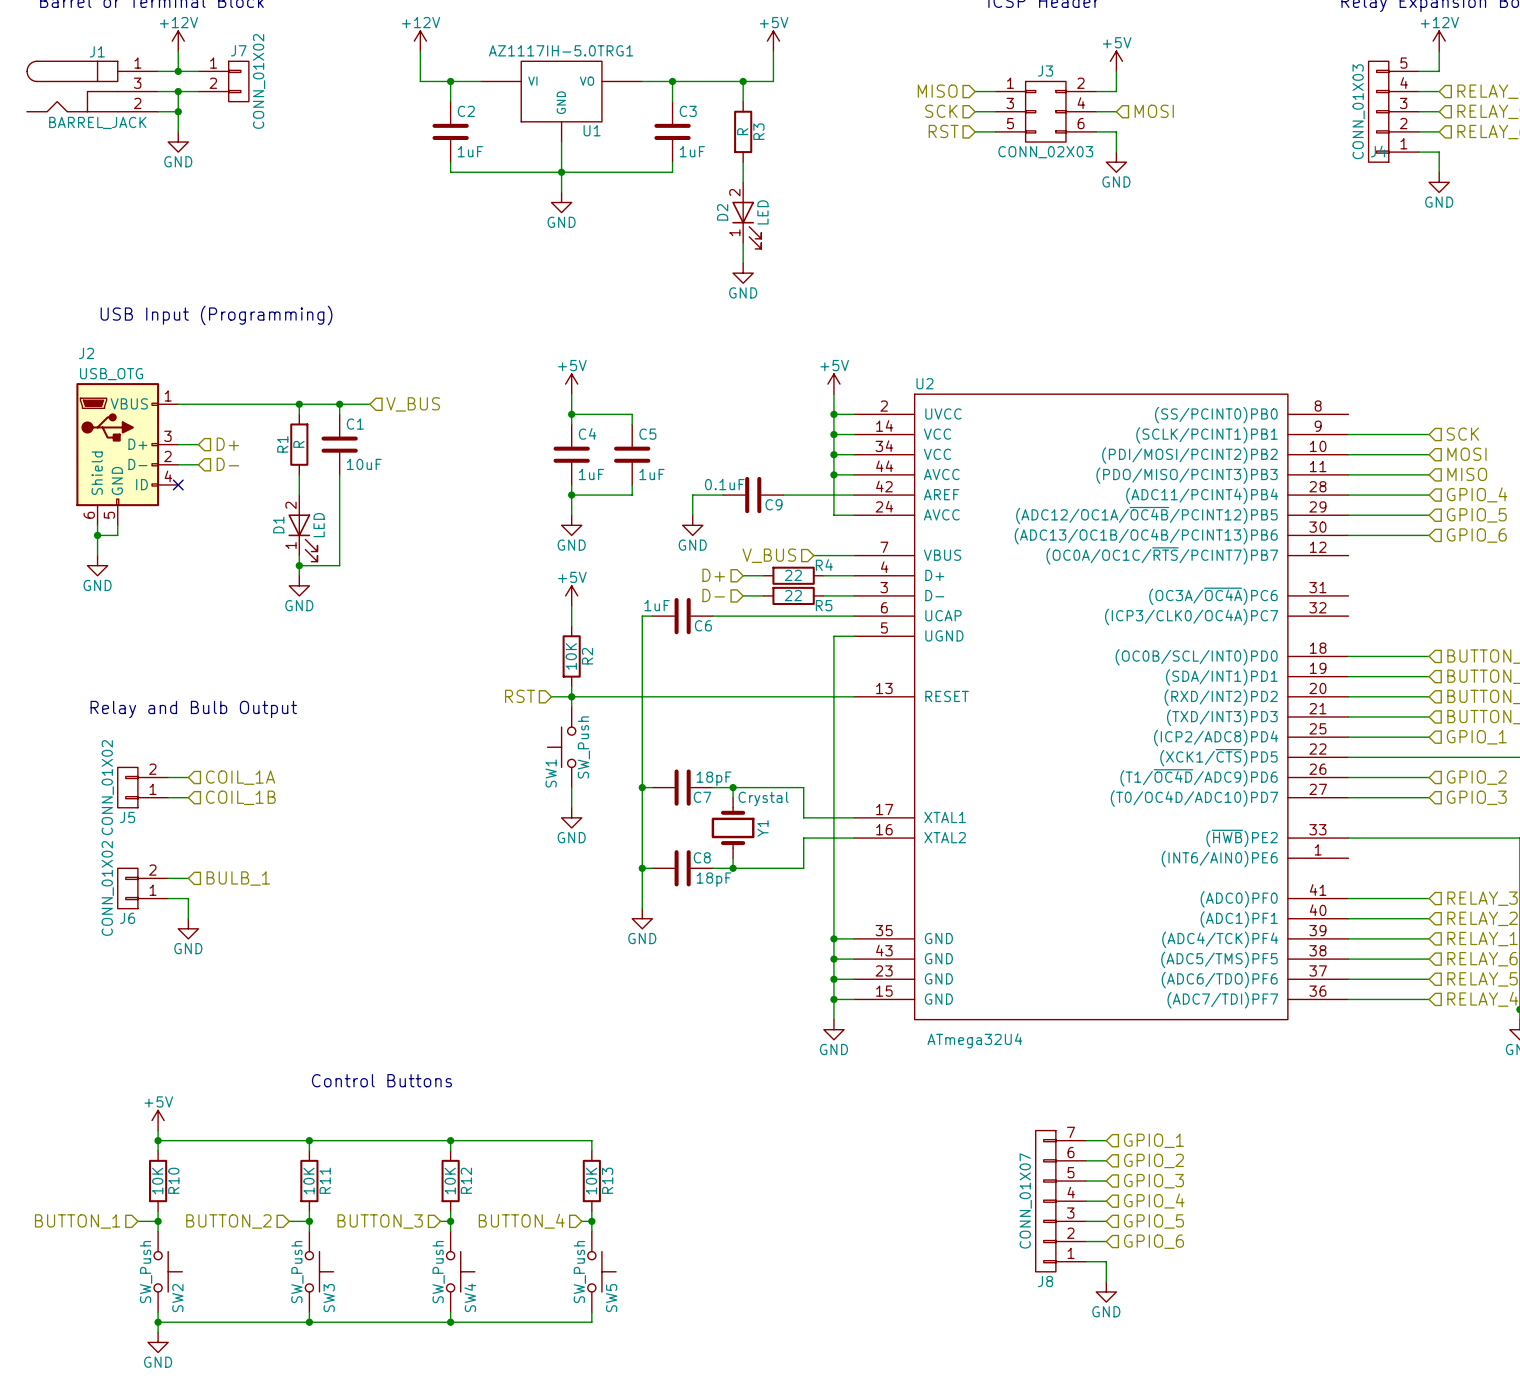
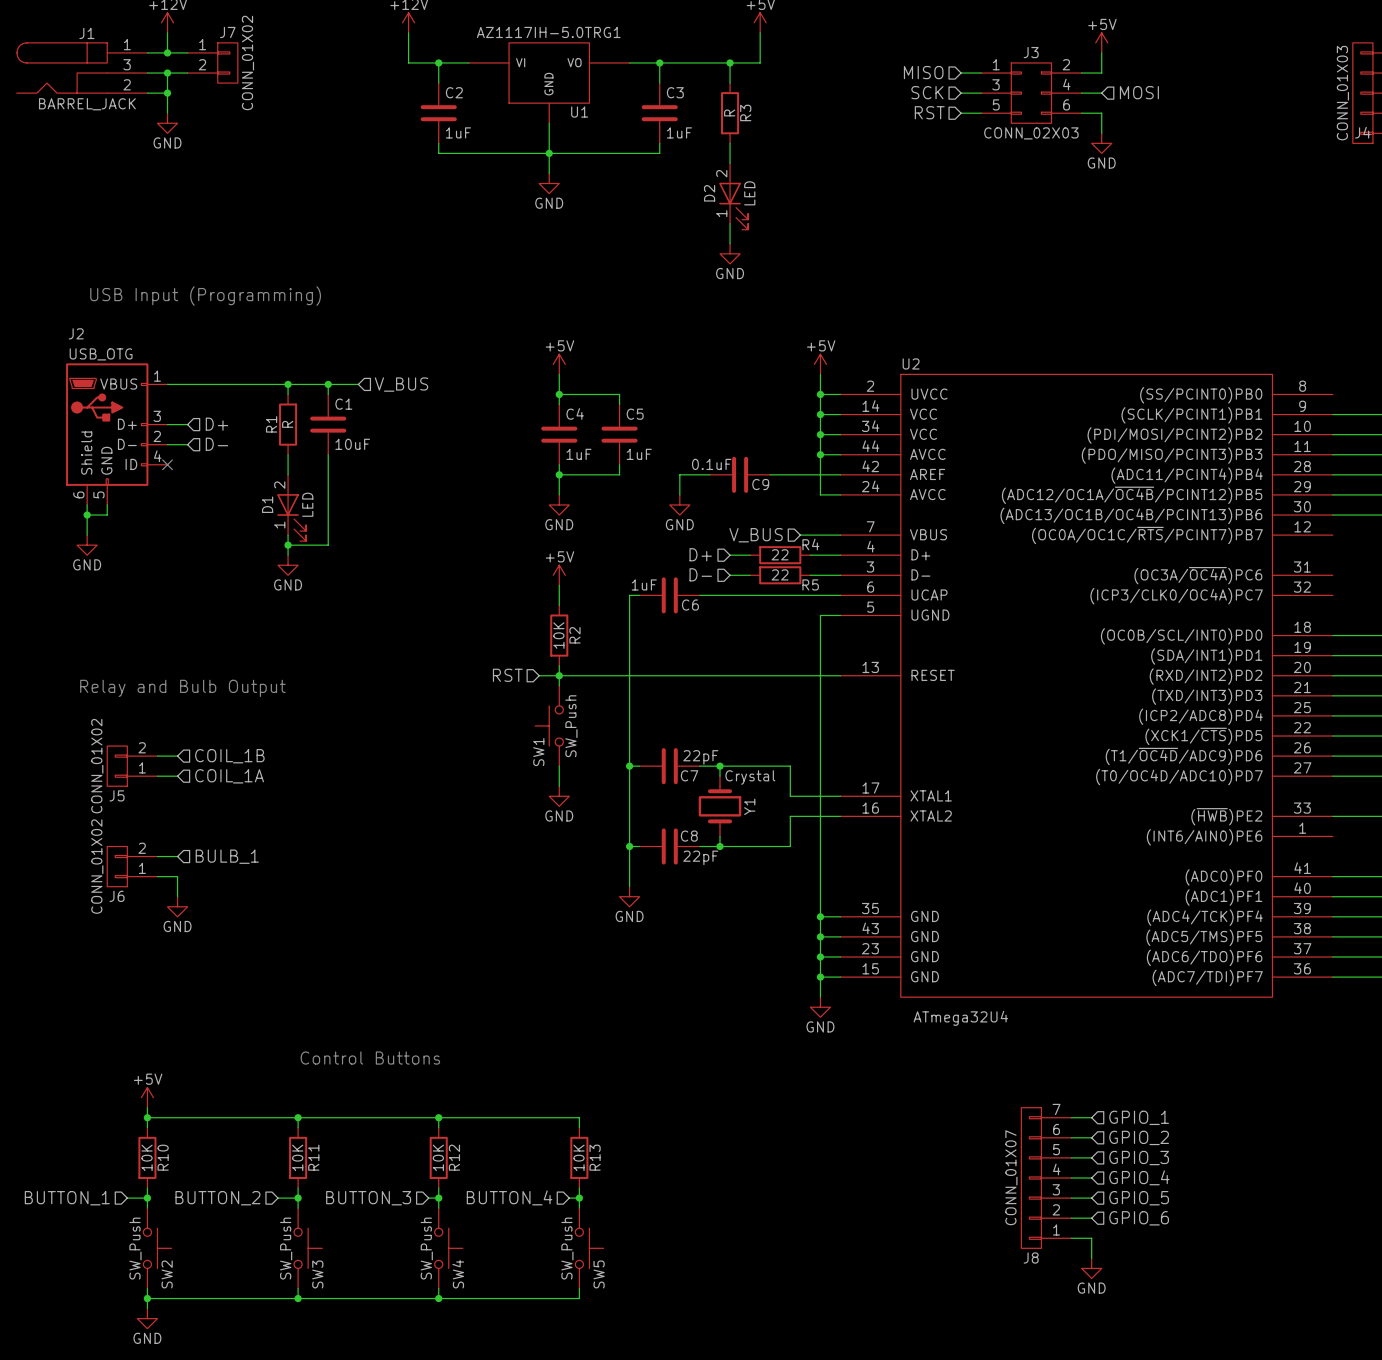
hierarchical label: COIL_1A (240, 777) -> COIL_1B (229, 756)
C7 value: 18pF (714, 778) -> 22pF (700, 757)
hierarchical label: COIL_1B (240, 797) -> COIL_1A (229, 776)
C8 value: 18pF (714, 879) -> 22pF (700, 857)

